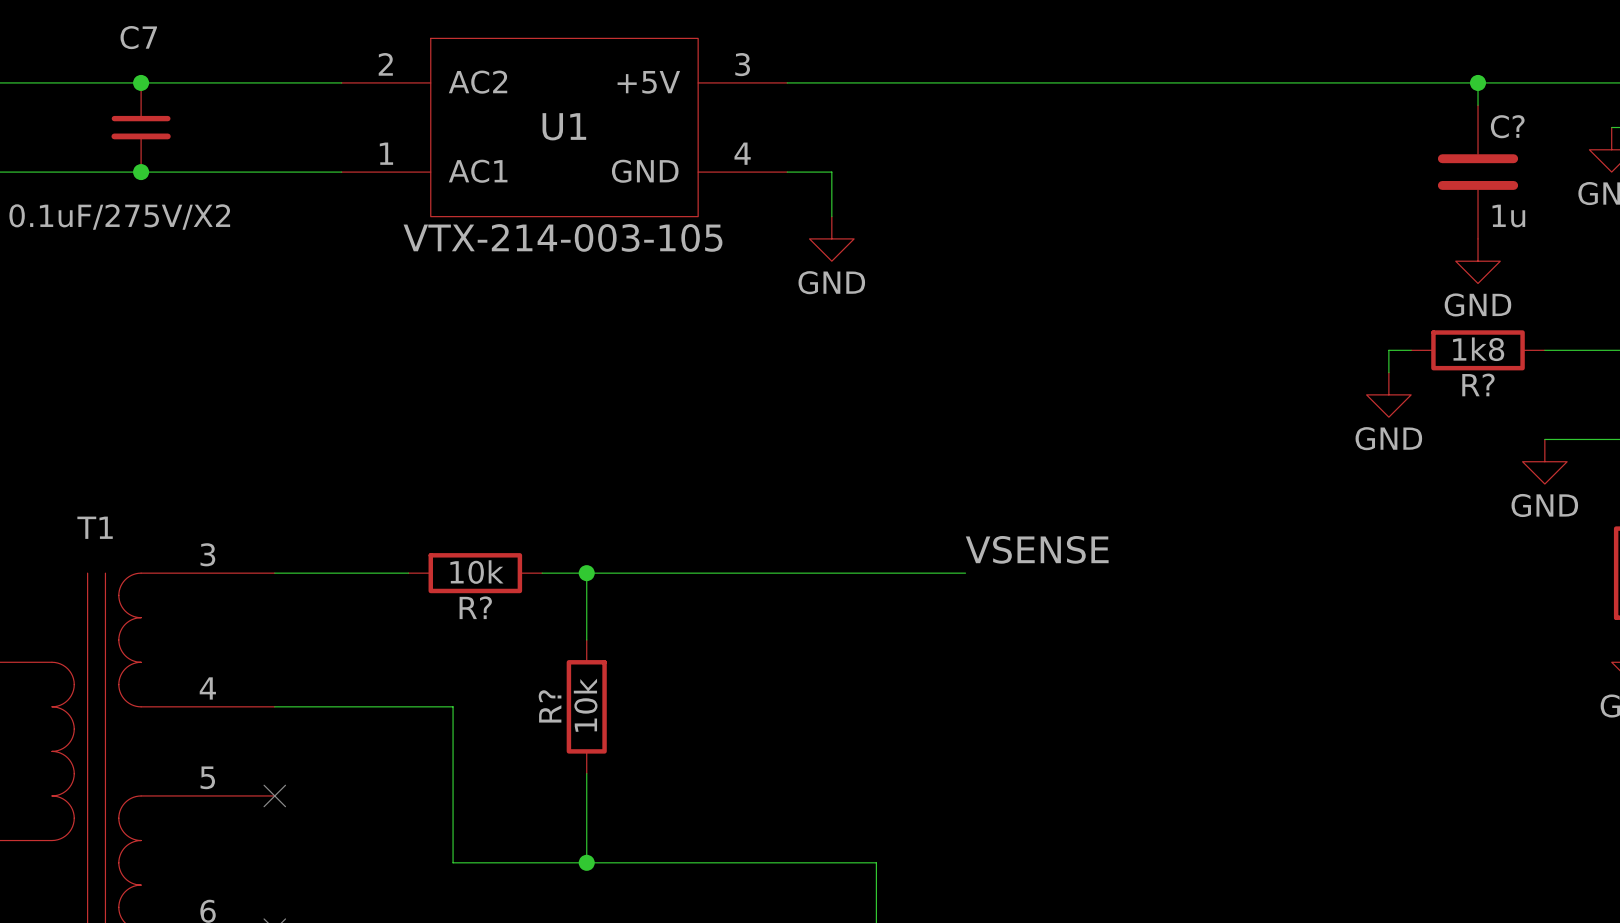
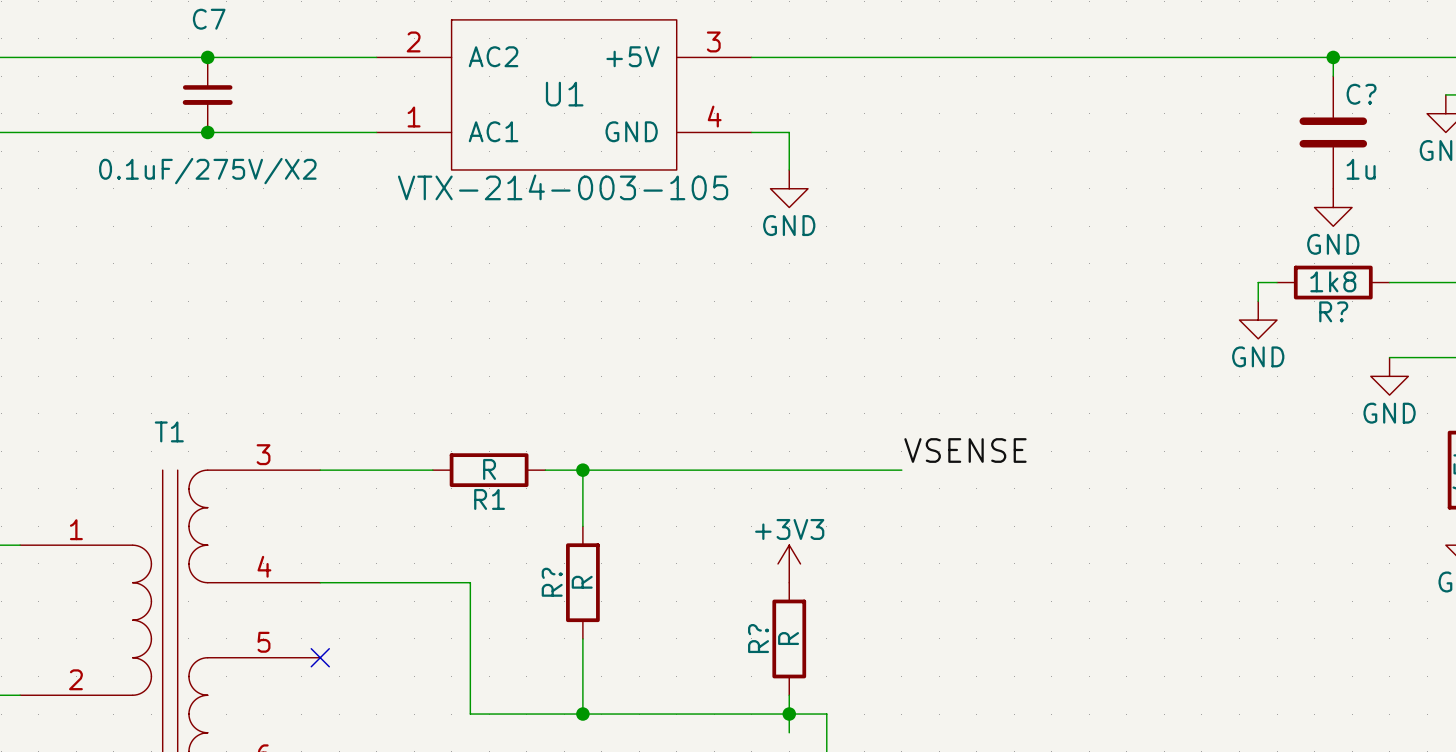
R? value: 10k (476, 572) -> R (489, 469)
R? name: R? (475, 607) -> R1 (489, 499)
power symbol: none -> +3V3 (789, 563)
R? value: 10k (585, 705) -> R (582, 582)
R?: none -> R (789, 638)
wire: none -> (789, 695) (789, 732)
junction: none -> (789, 714)

